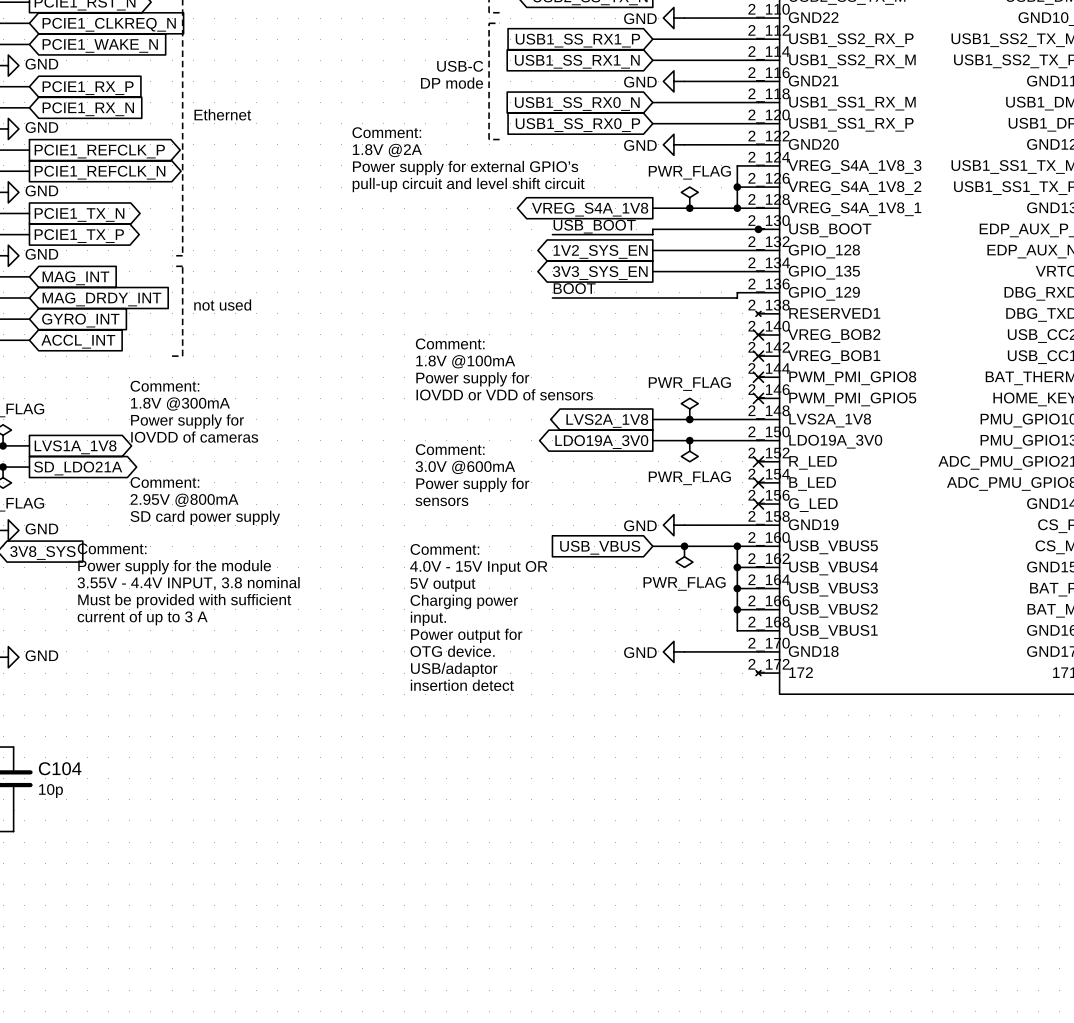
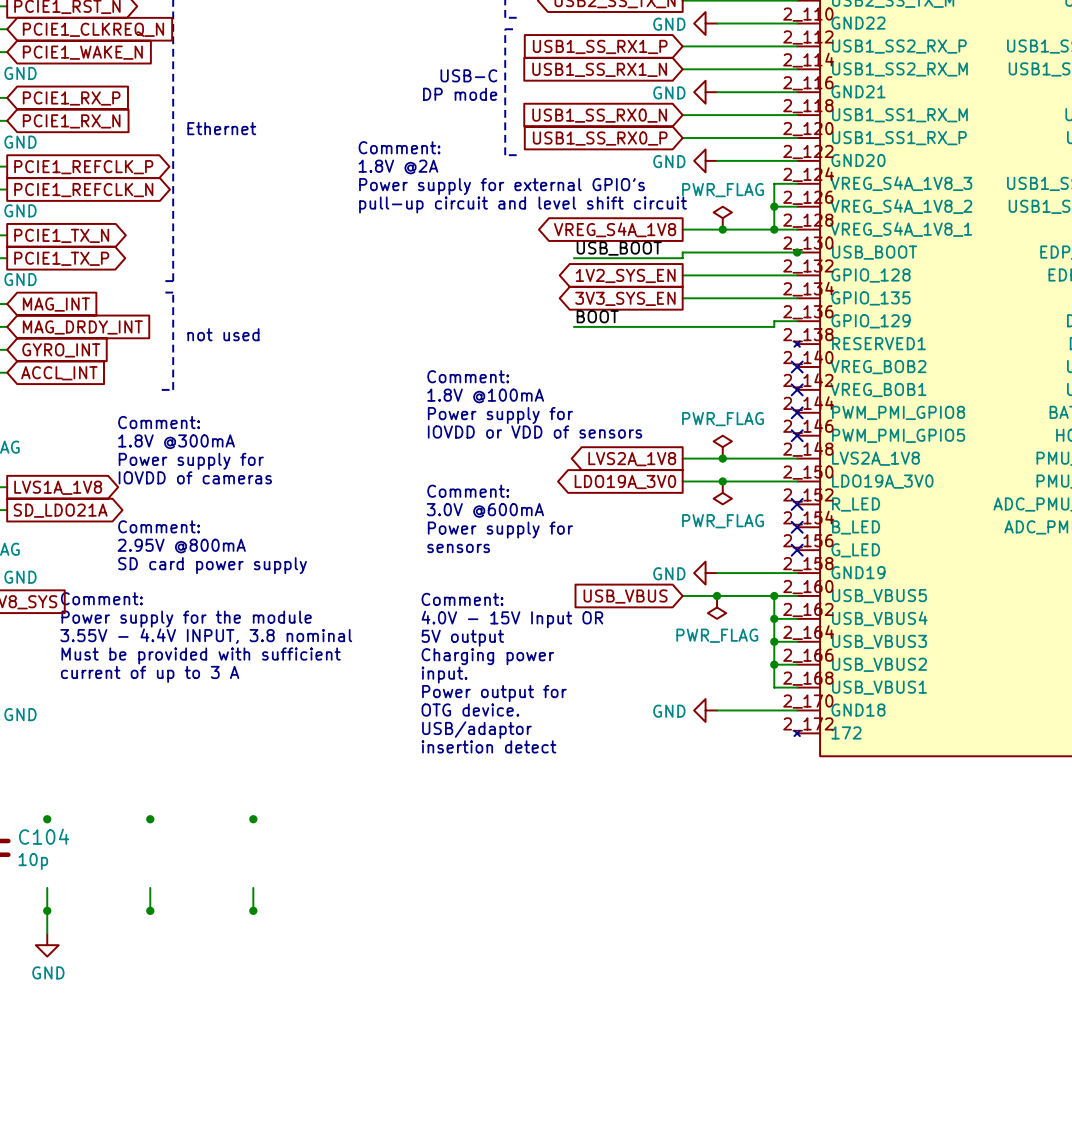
junction: none -> (47, 819)
junction: none -> (150, 819)
junction: none -> (253, 819)
wire: none -> (47, 887) (47, 933)
wire: none -> (150, 887) (150, 910)
wire: none -> (253, 887) (253, 910)
junction: none -> (47, 910)
junction: none -> (150, 910)
junction: none -> (253, 910)
power symbol: none -> GND (47, 945)

